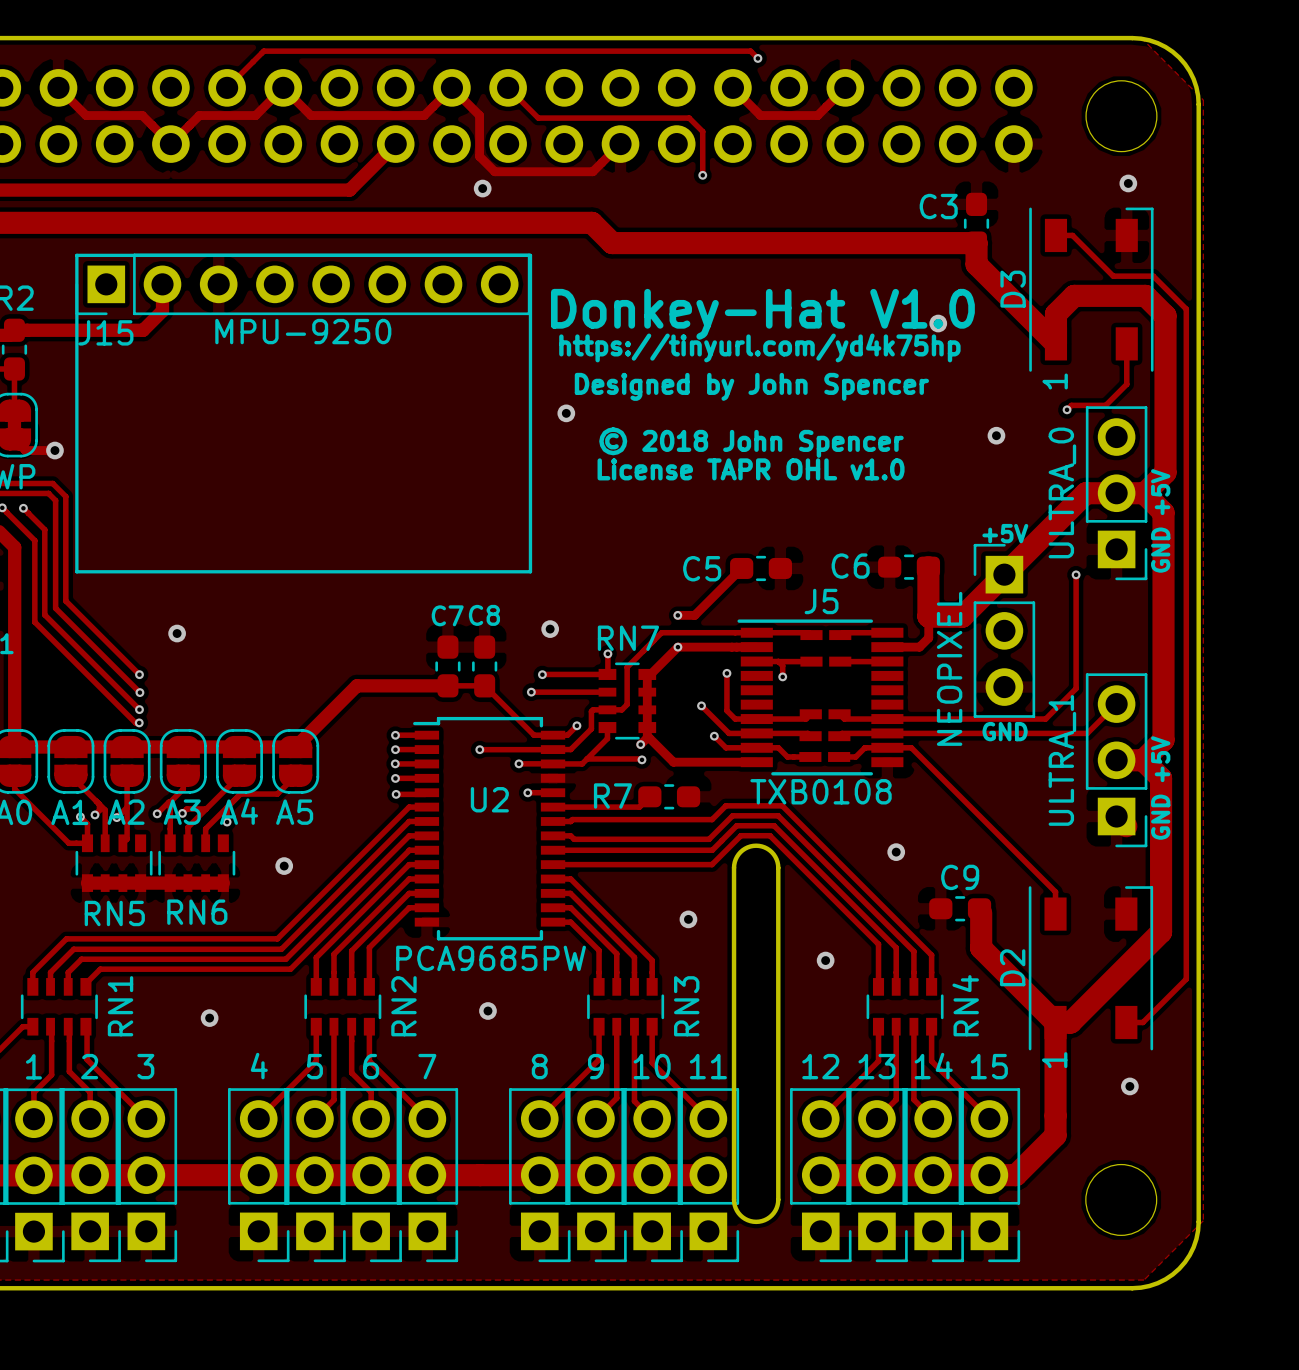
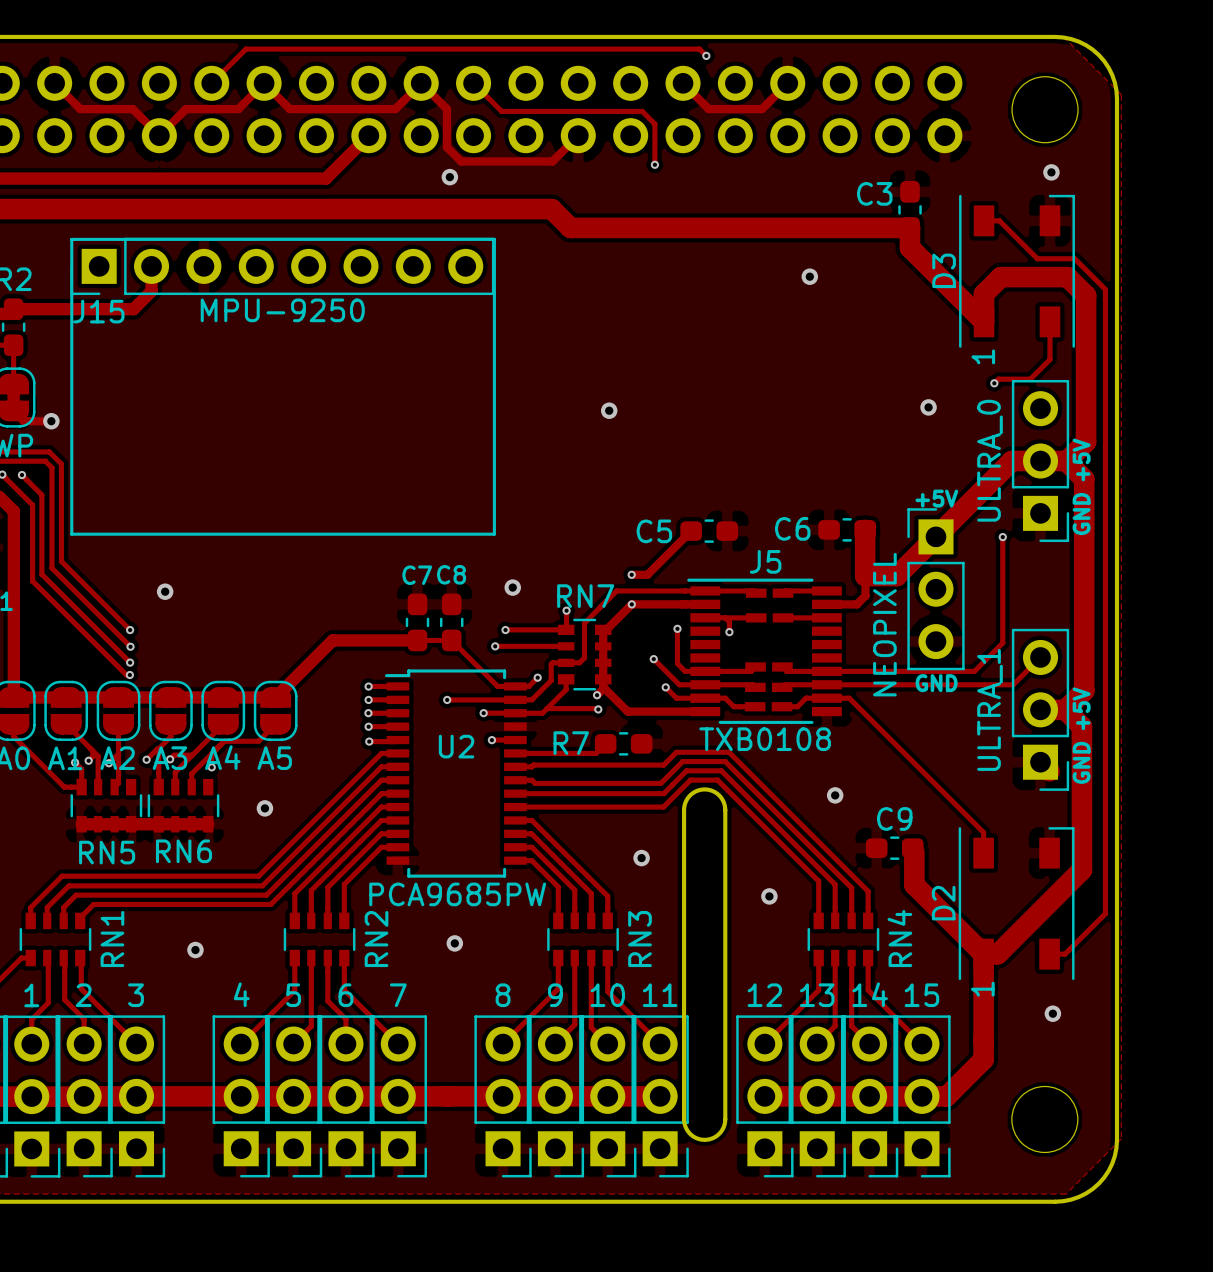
text: Donkey-Hat V1.0 (762, 314) -> none
via position: (938, 323) -> (809, 276)
text: https://tinyurl.com/yd4k75hp (759, 347) -> none
text: Designed by John Spencer (751, 386) -> none
via position: (566, 413) -> (609, 410)
text: © 2018 John Spencer (751, 442) -> none
text: License TAPR OHL v1.0 (751, 469) -> none

